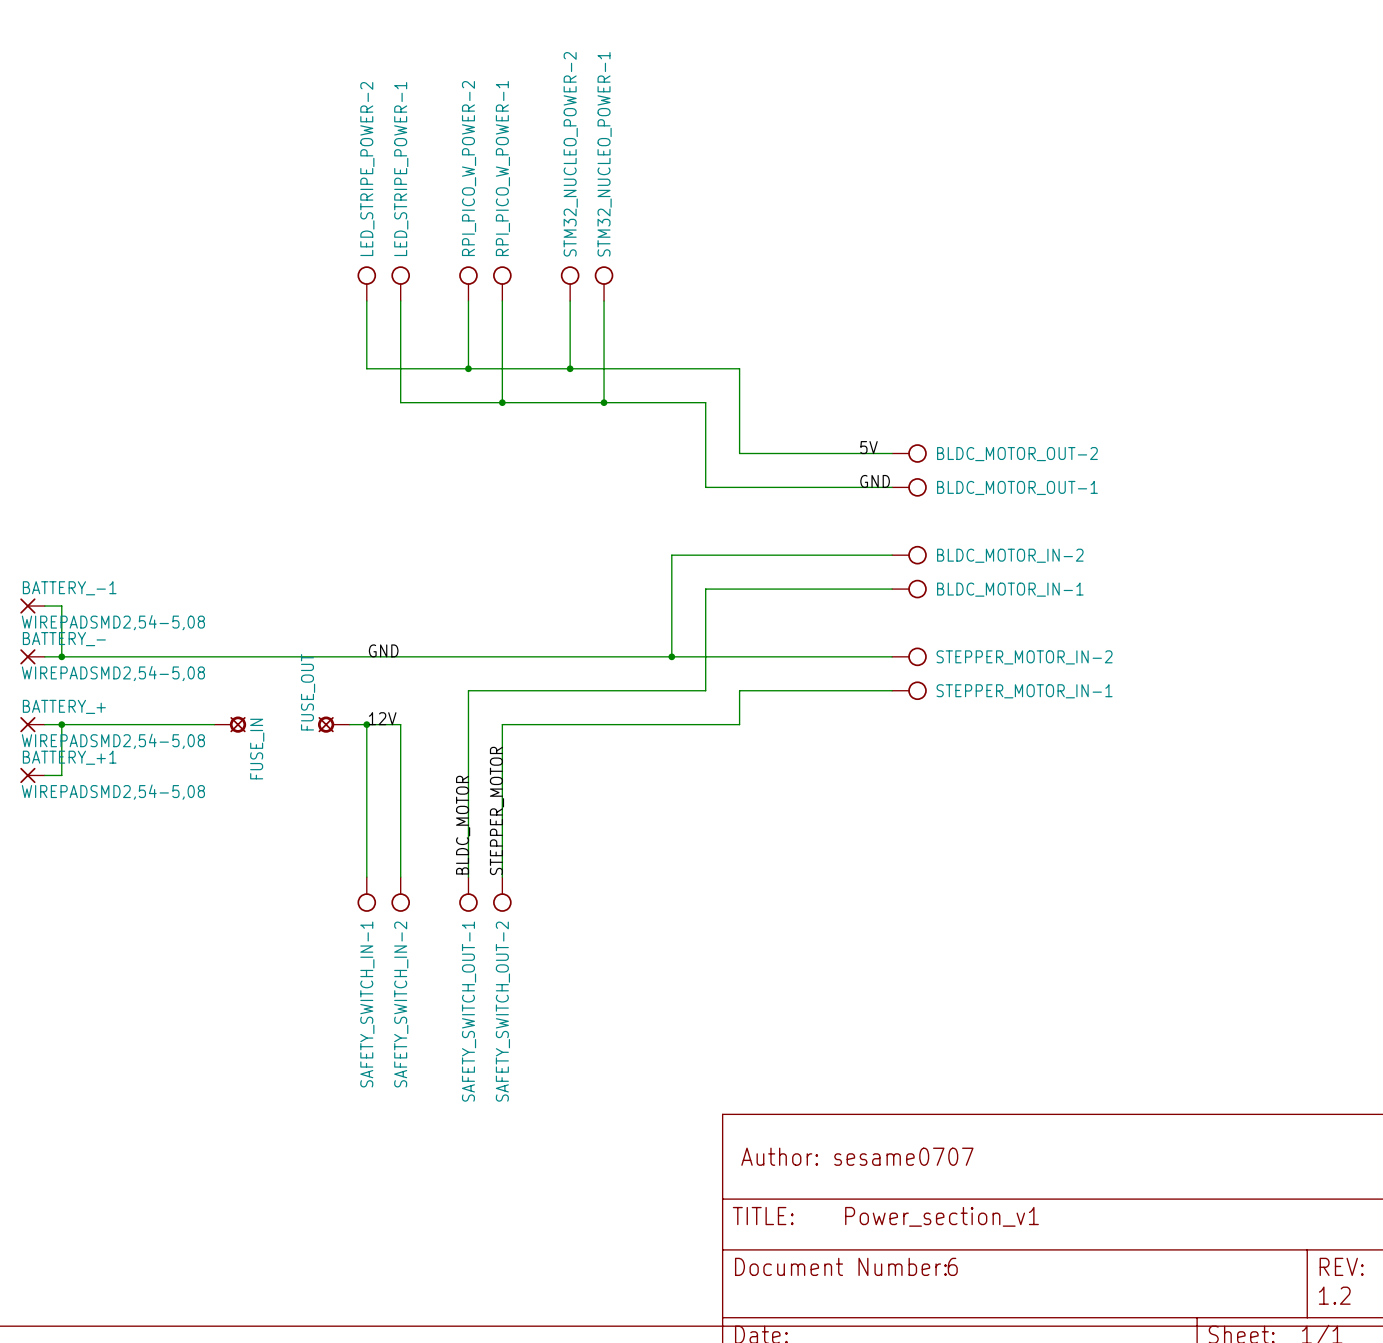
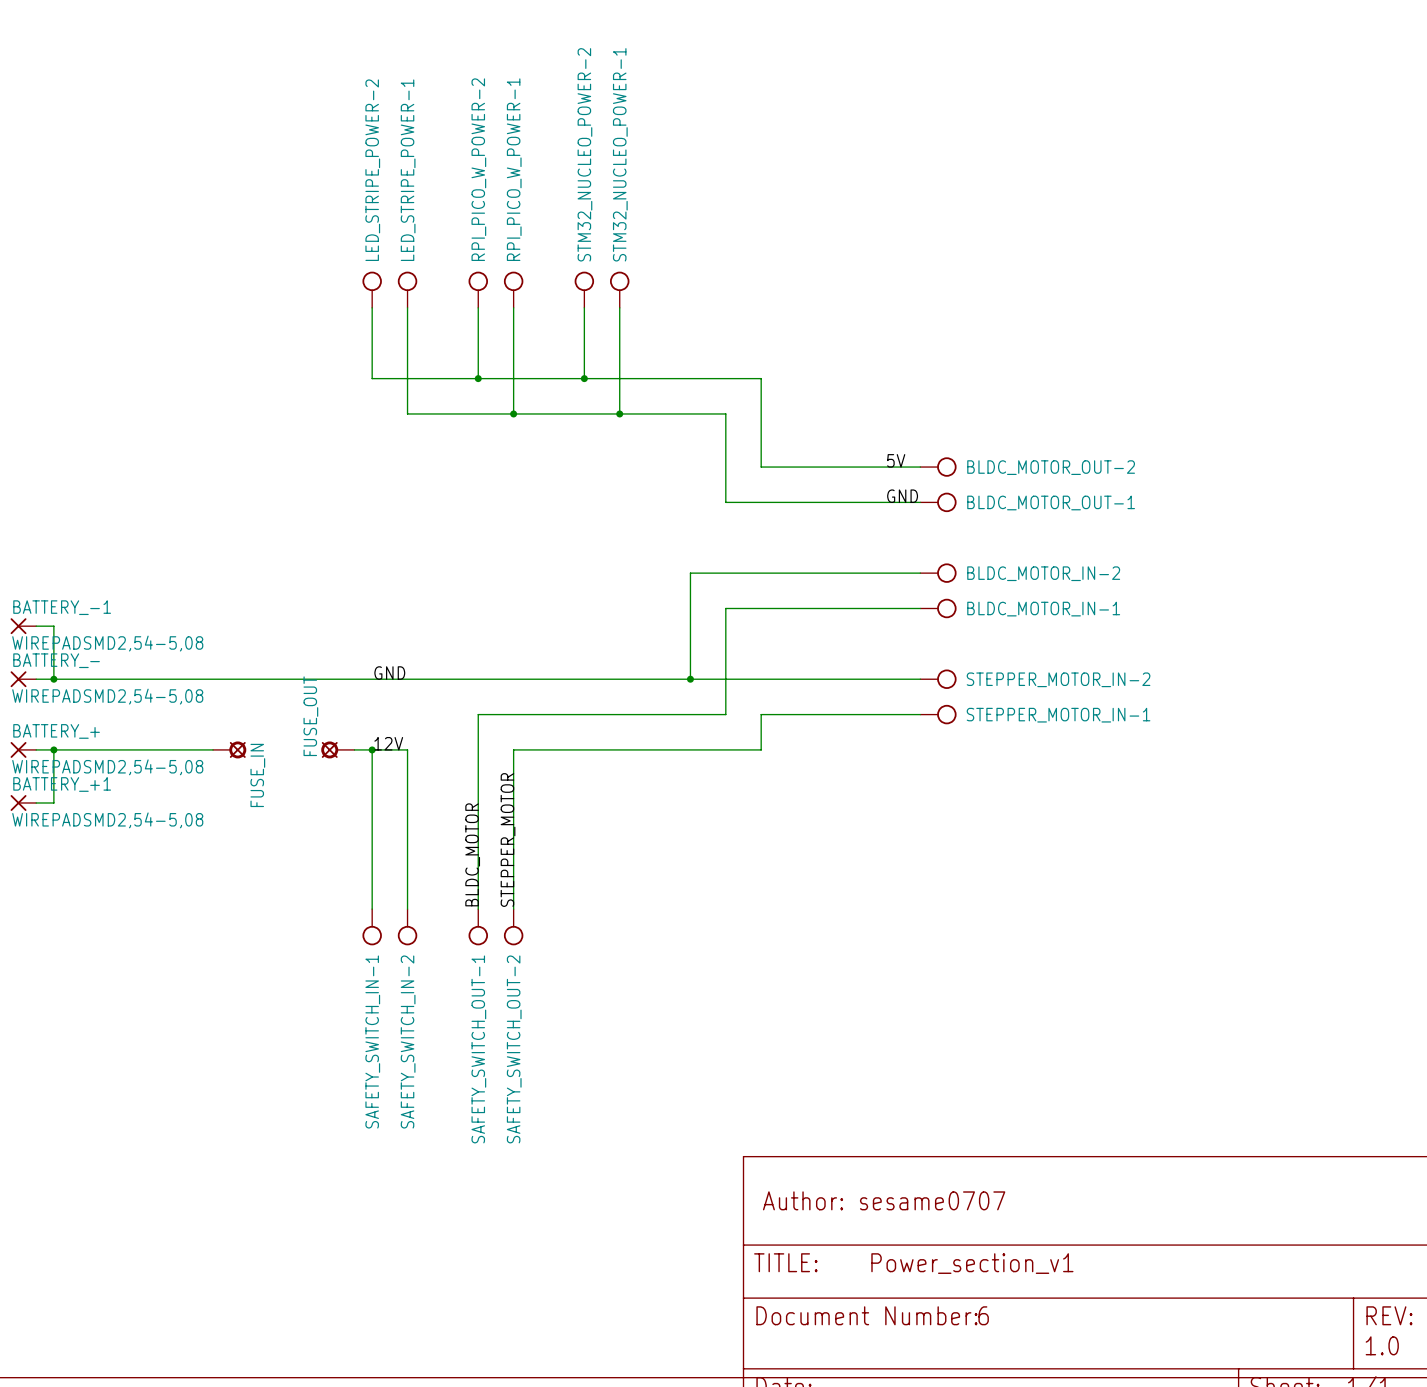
text: 1.2 (1334, 1295) -> 1.0 (1382, 1345)

